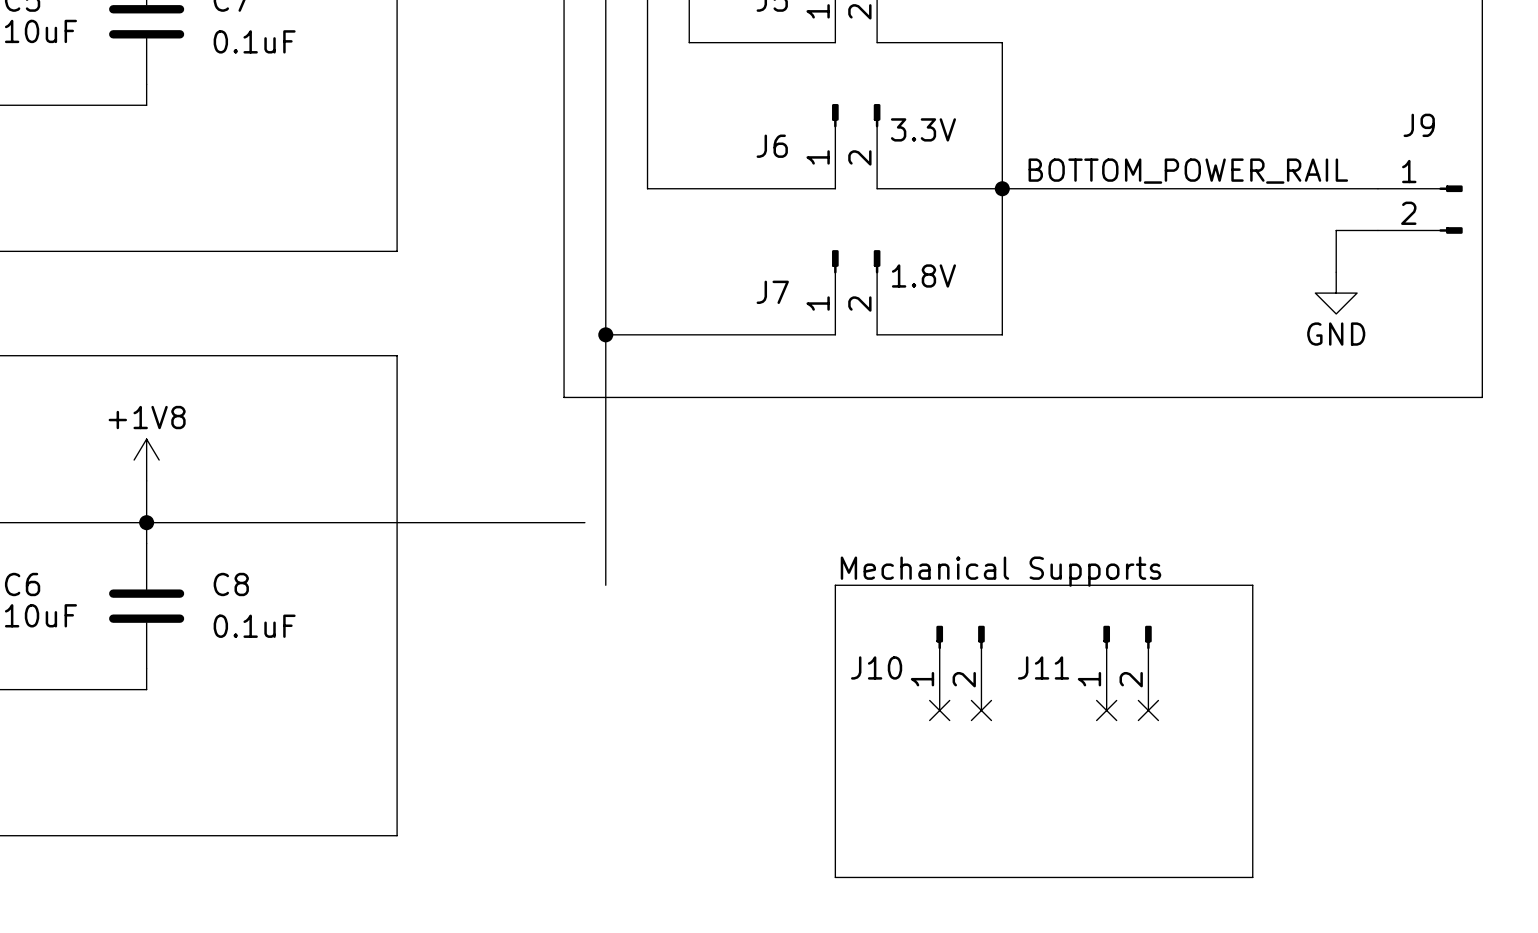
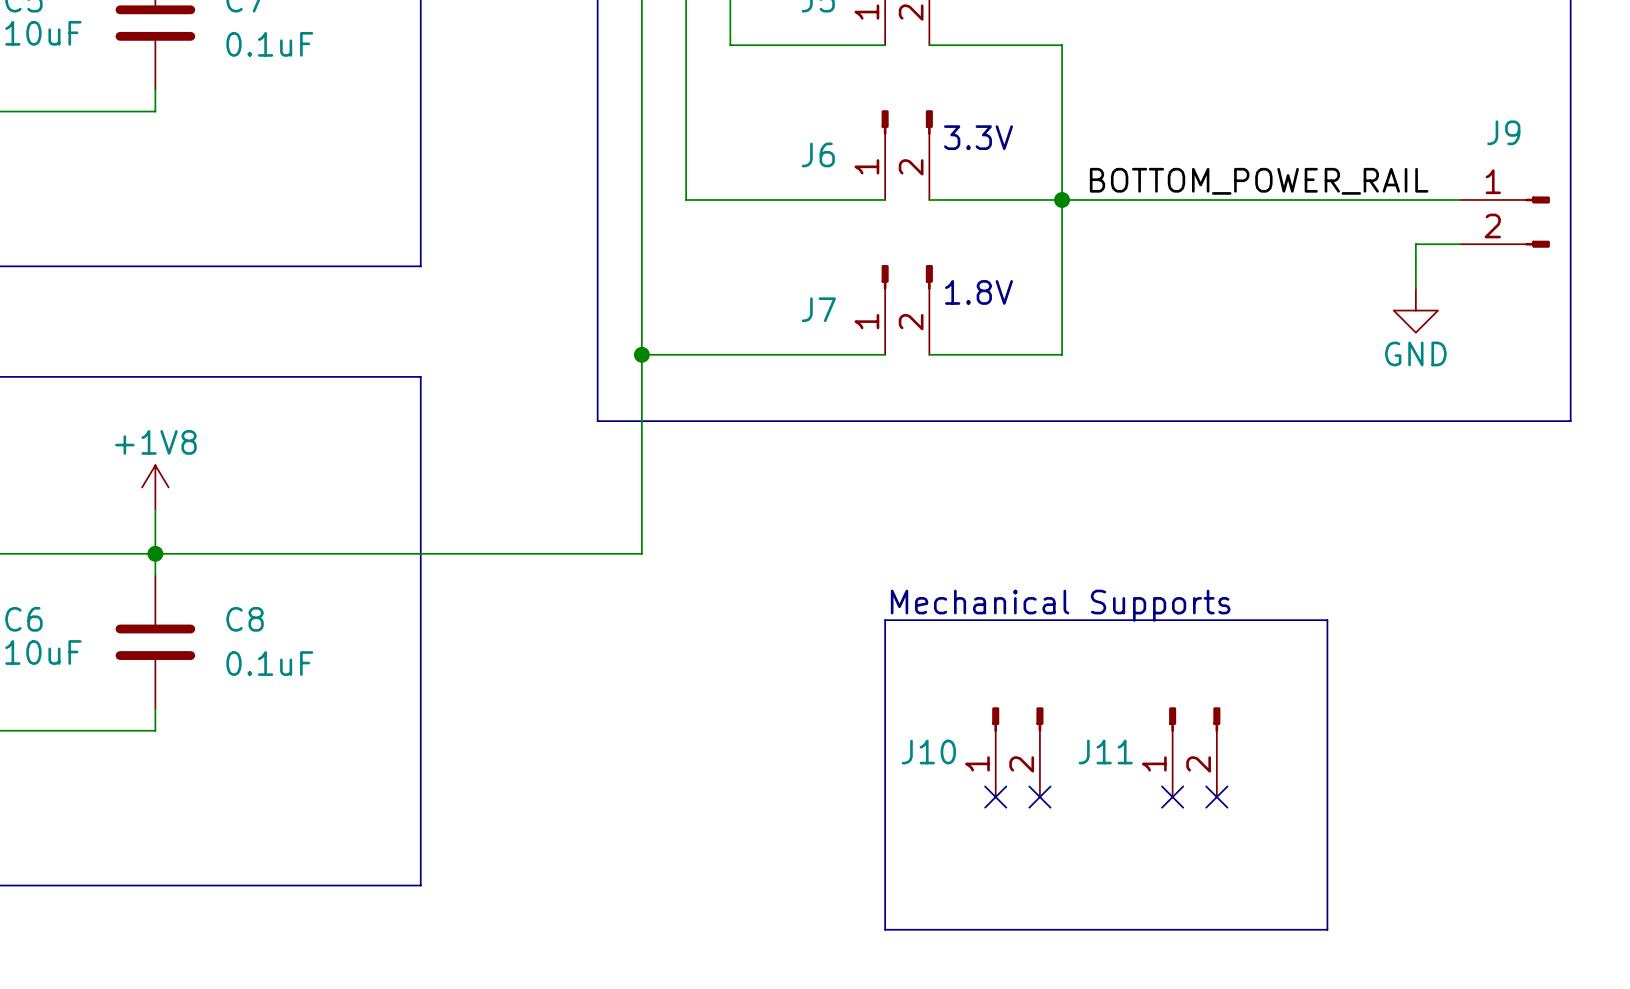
wire: (605, 522) (605, 585) -> (641, 553) (619, 553)
J10 position: (960, 668) -> (1017, 752)
J11 position: (1127, 668) -> (1194, 752)
no-connect mark: (939, 710) -> none
no-connect mark: (981, 710) -> none
no-connect mark: (1106, 710) -> none
no-connect mark: (1148, 710) -> none
no-connect mark: none -> (995, 797)
no-connect mark: none -> (1039, 797)
no-connect mark: none -> (1172, 797)
no-connect mark: none -> (1216, 797)

